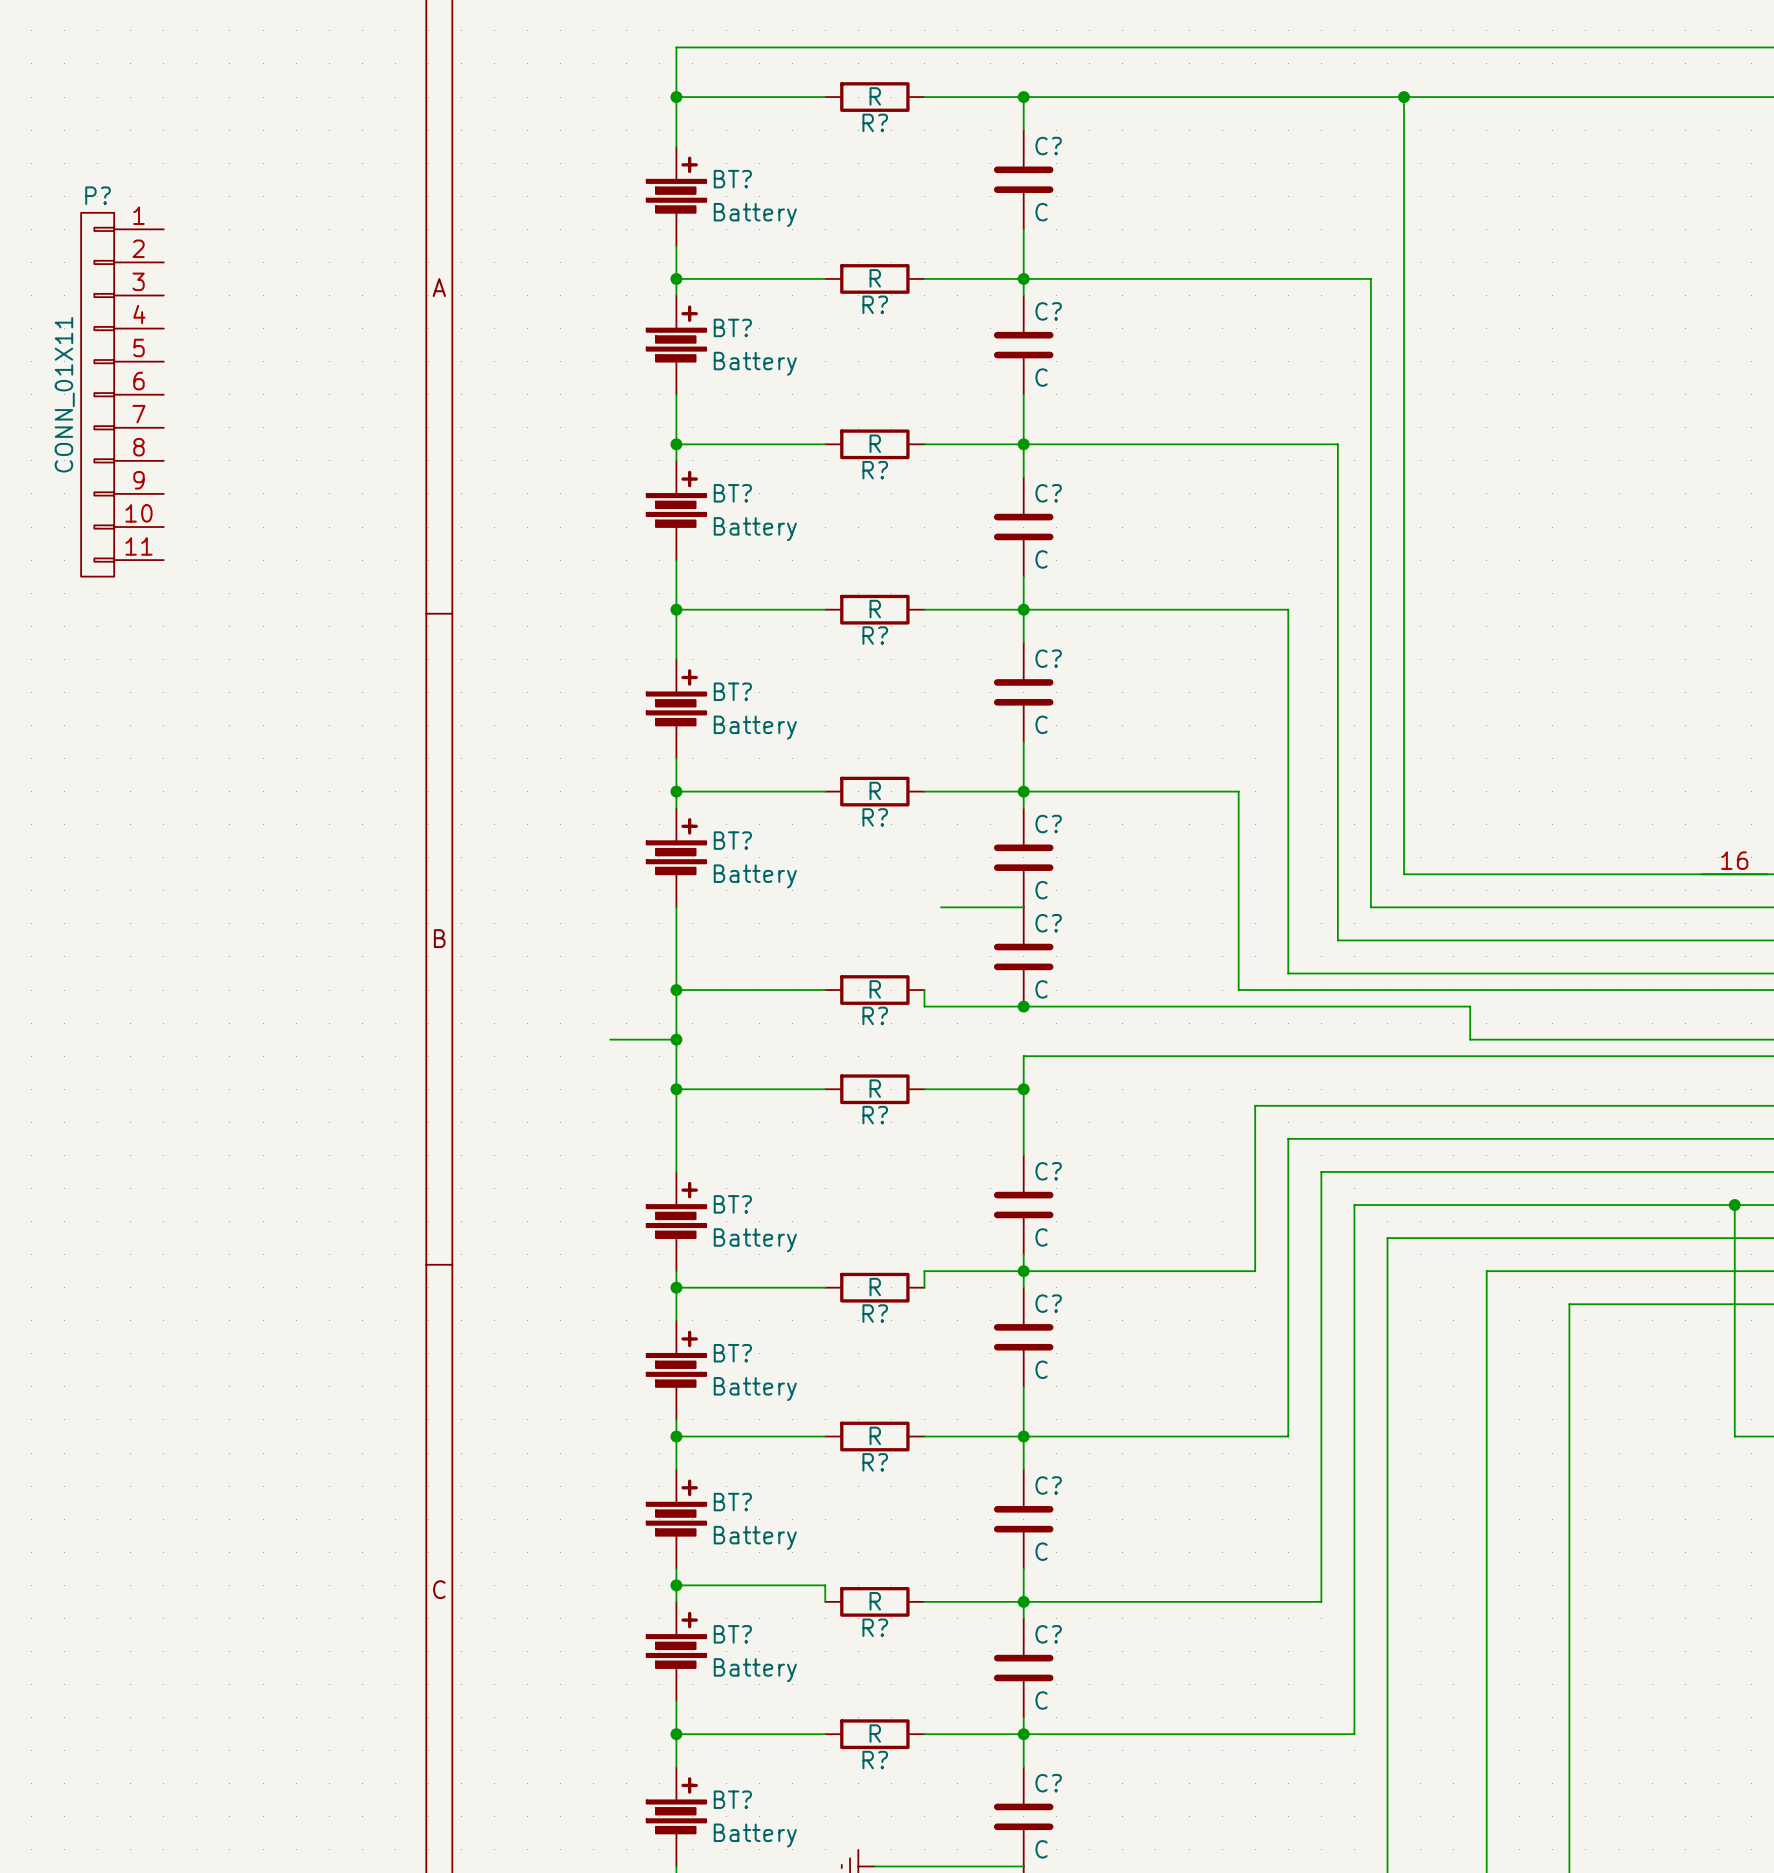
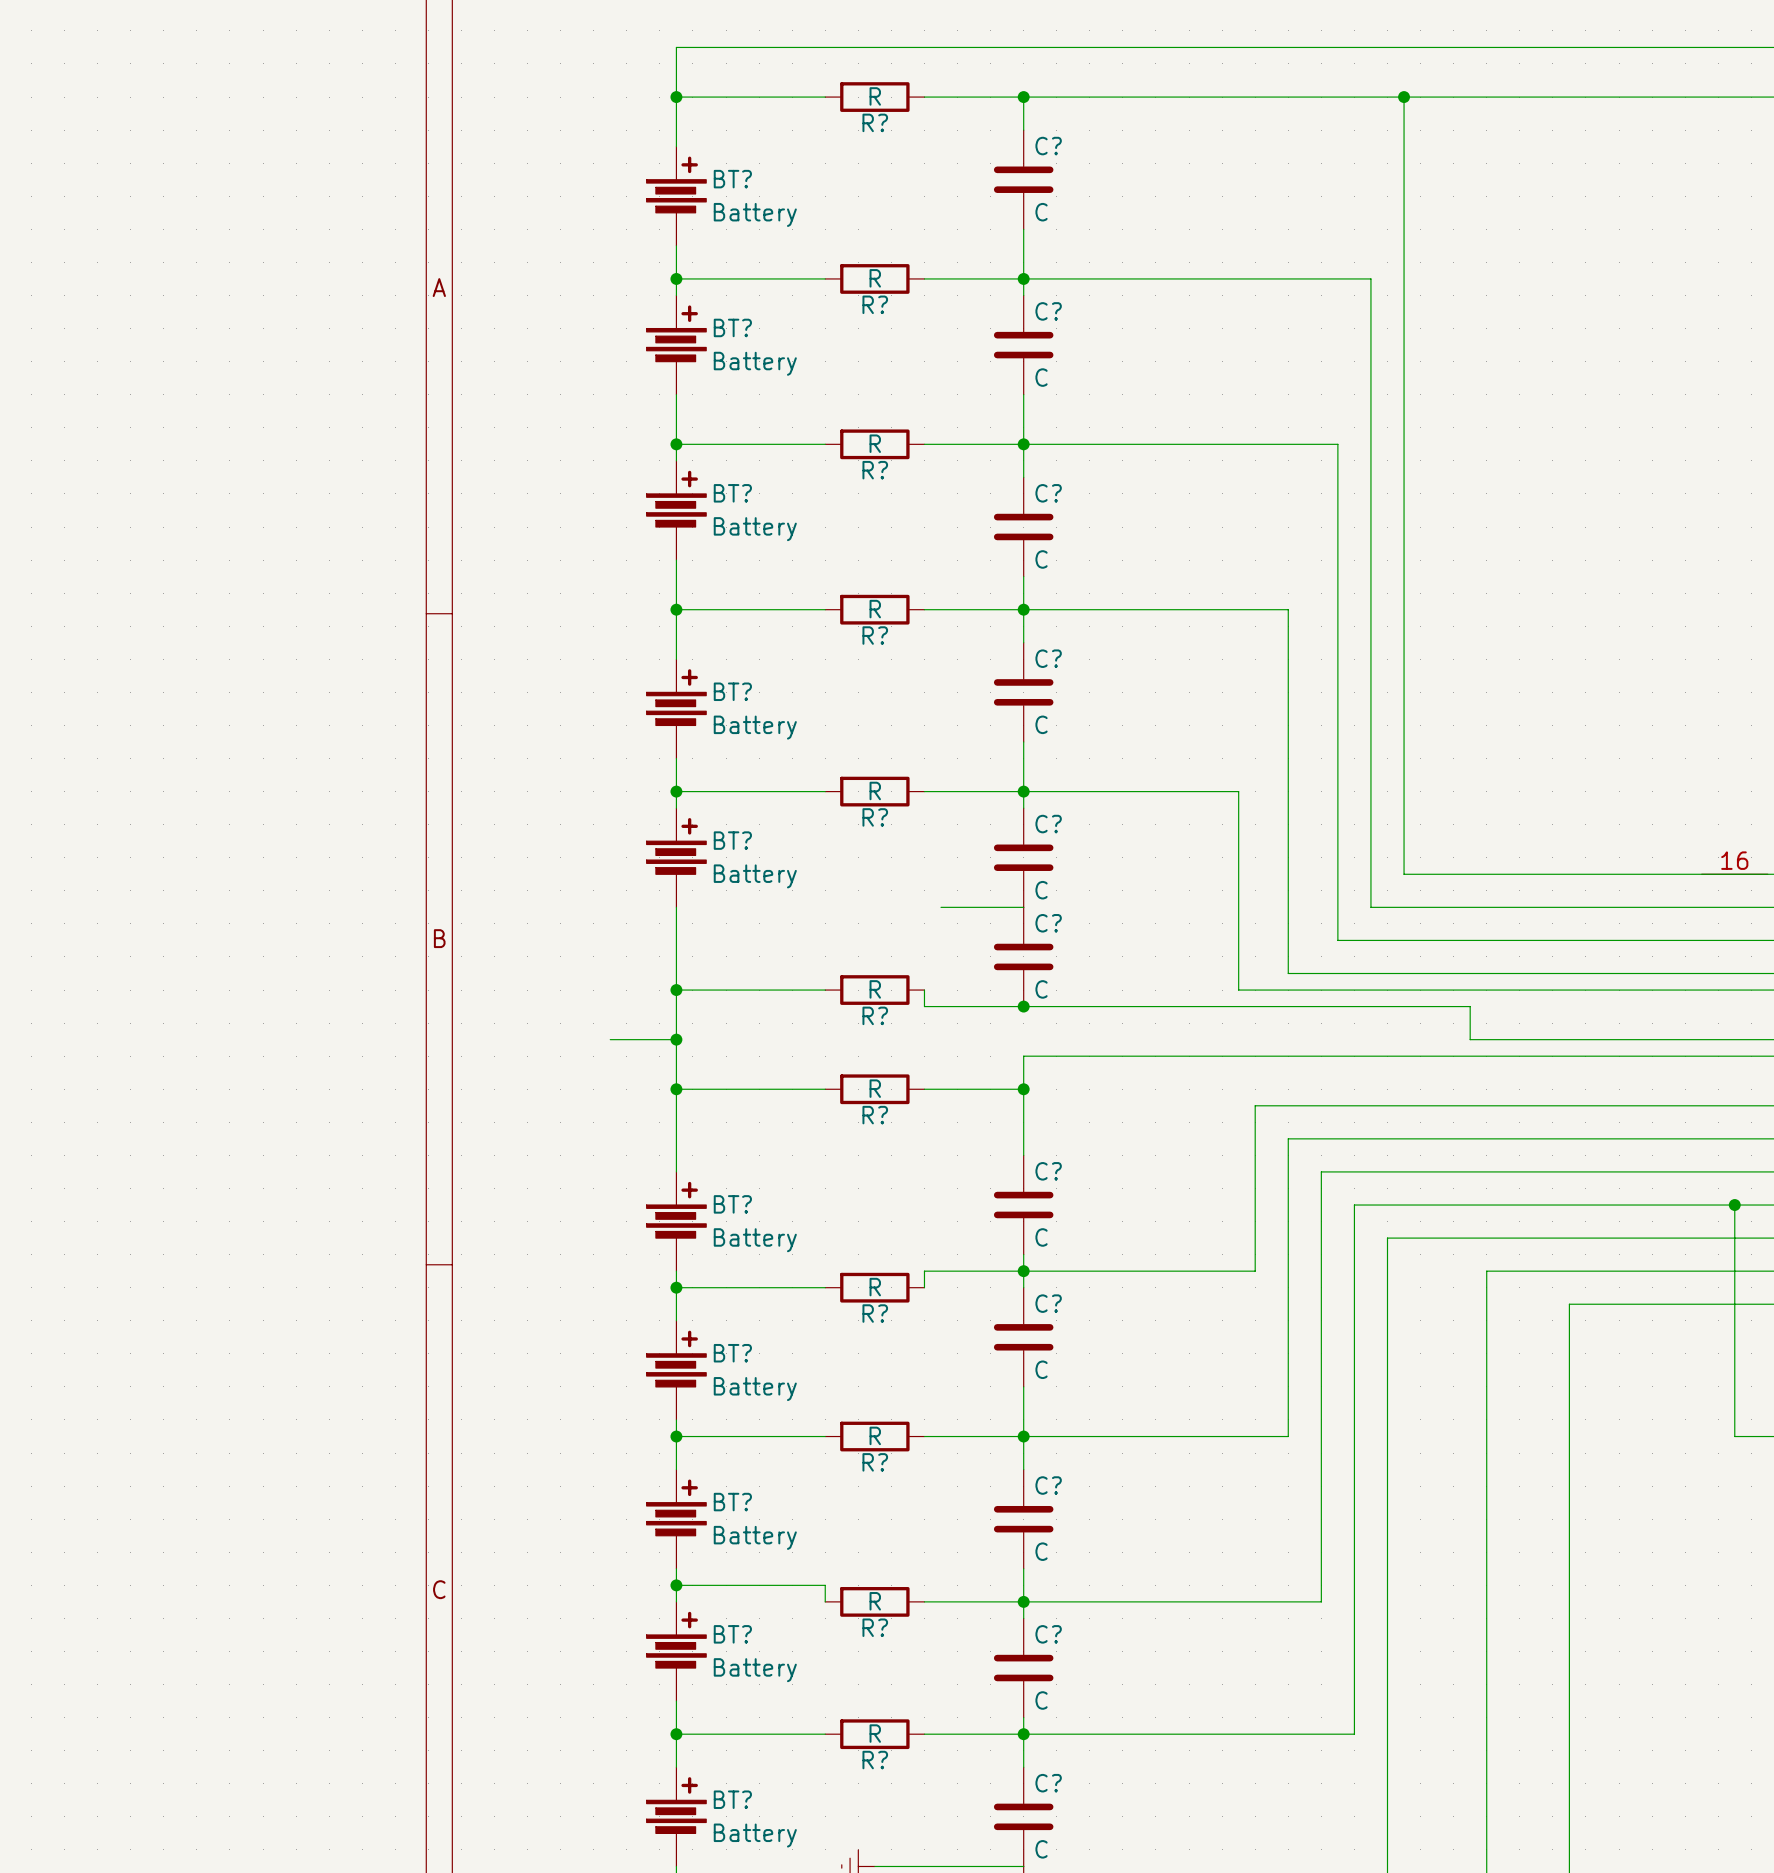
P?: CONN_01X11 (122, 394) -> none

